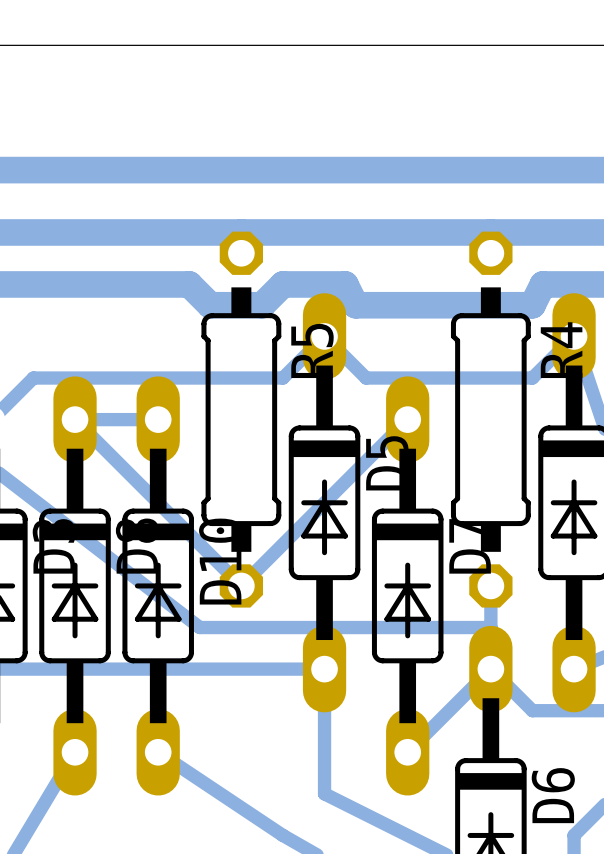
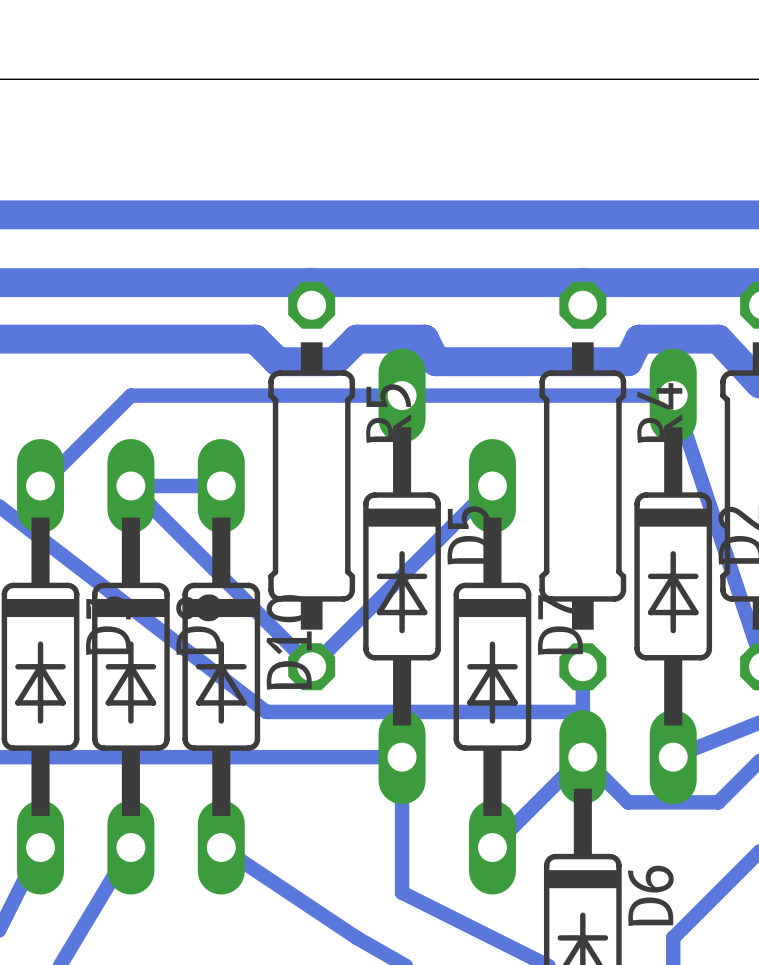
bottom track: (574, 336) (532, 378) (366, 378) (324, 336) (282, 378) (33, 378) -> (673, 395) (130, 395) (85, 440)

